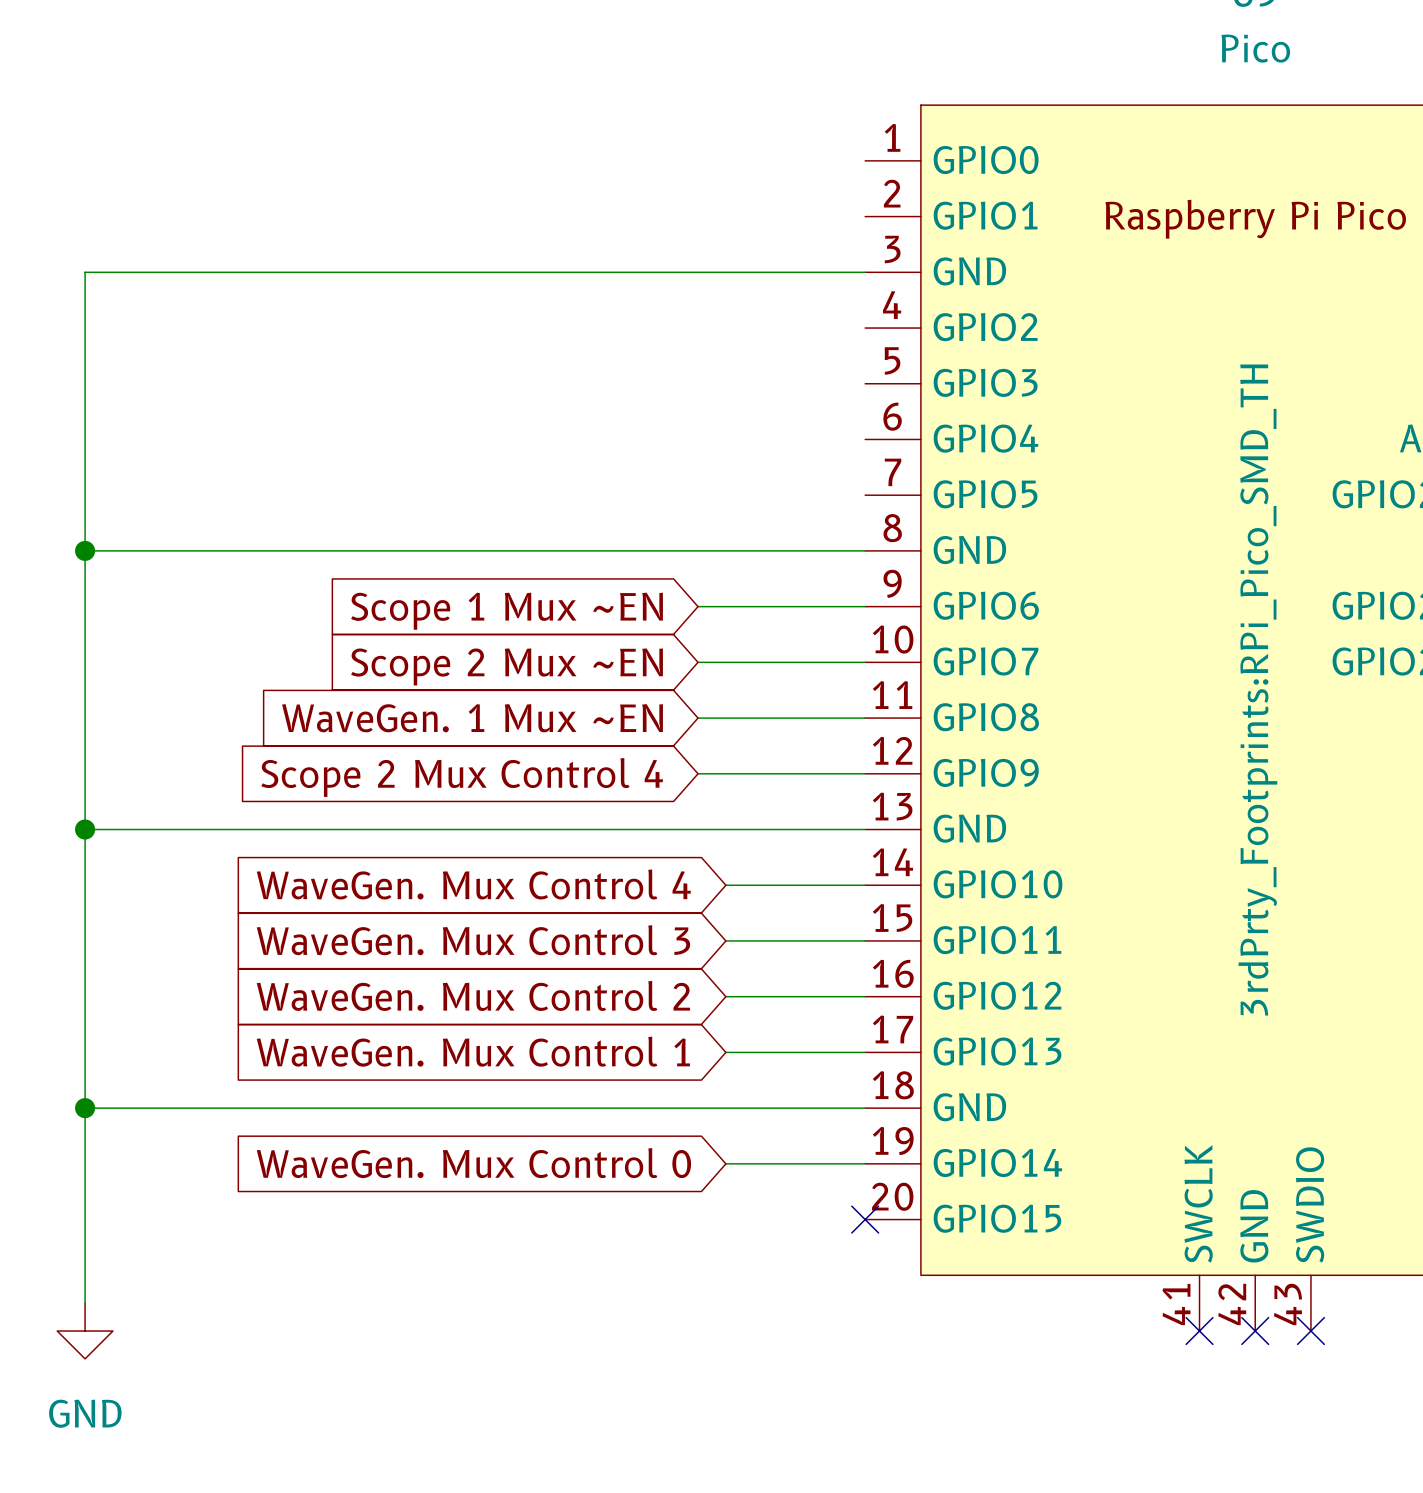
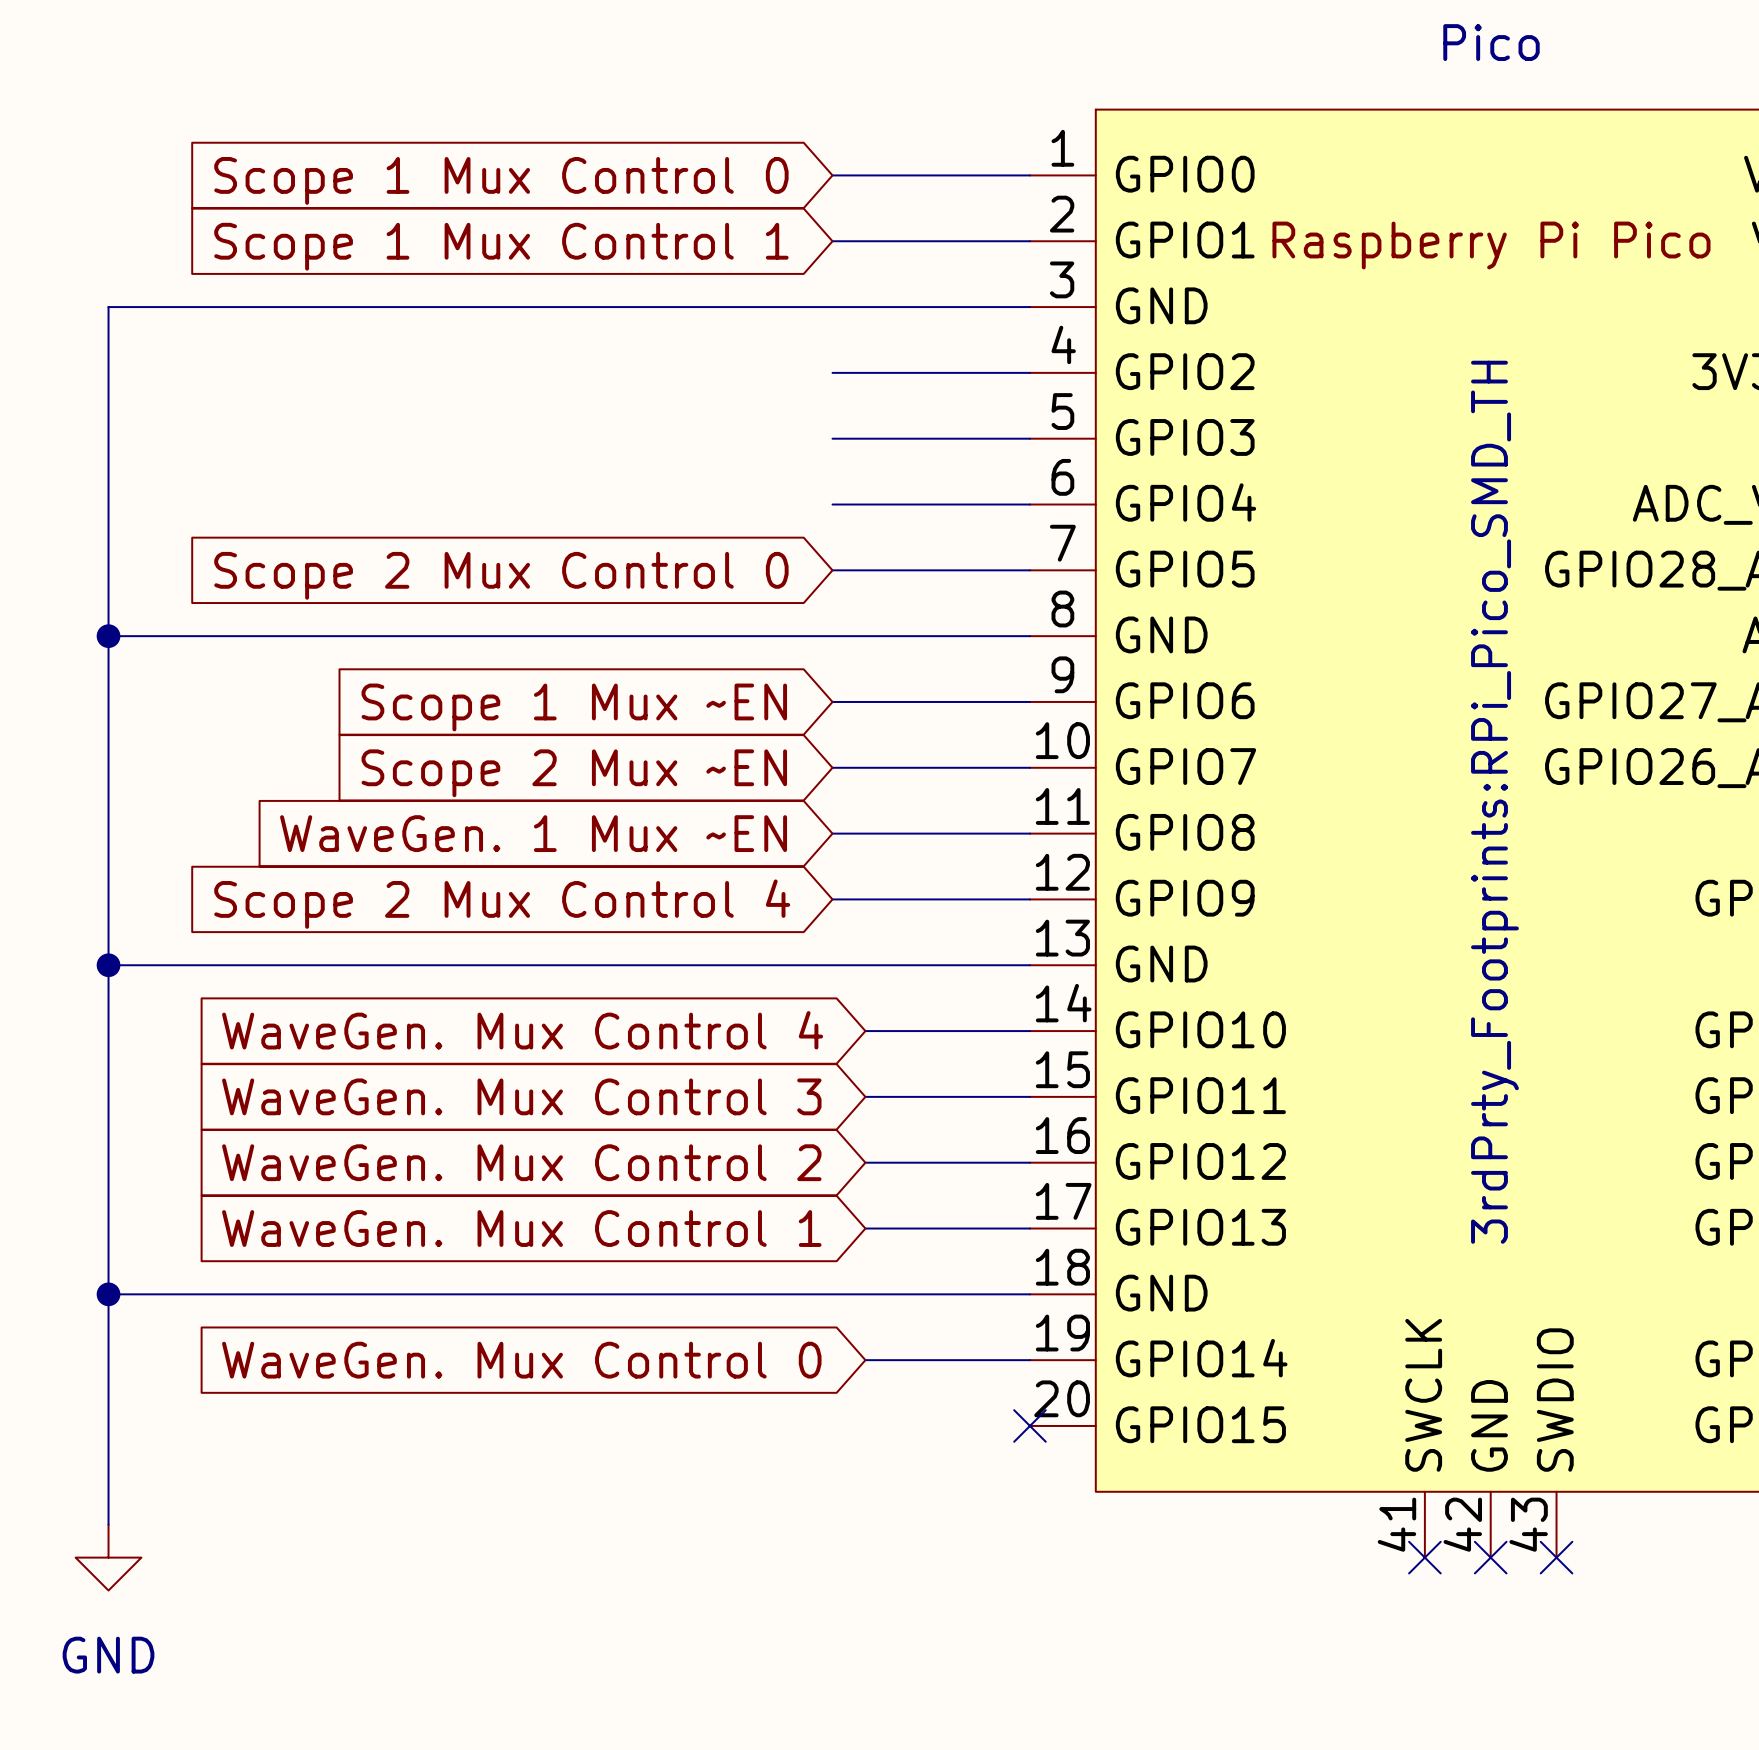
wire: none -> (832, 175) (1029, 175)
global label: none -> Scope 1 Mux Control 0 (501, 180)
wire: none -> (832, 241) (1029, 241)
global label: none -> Scope 1 Mux Control 1 (501, 246)
wire: none -> (832, 372) (1029, 372)
wire: none -> (832, 438) (1029, 438)
wire: none -> (832, 504) (1029, 504)
wire: none -> (832, 570) (1029, 570)
global label: none -> Scope 2 Mux Control 0 (501, 575)

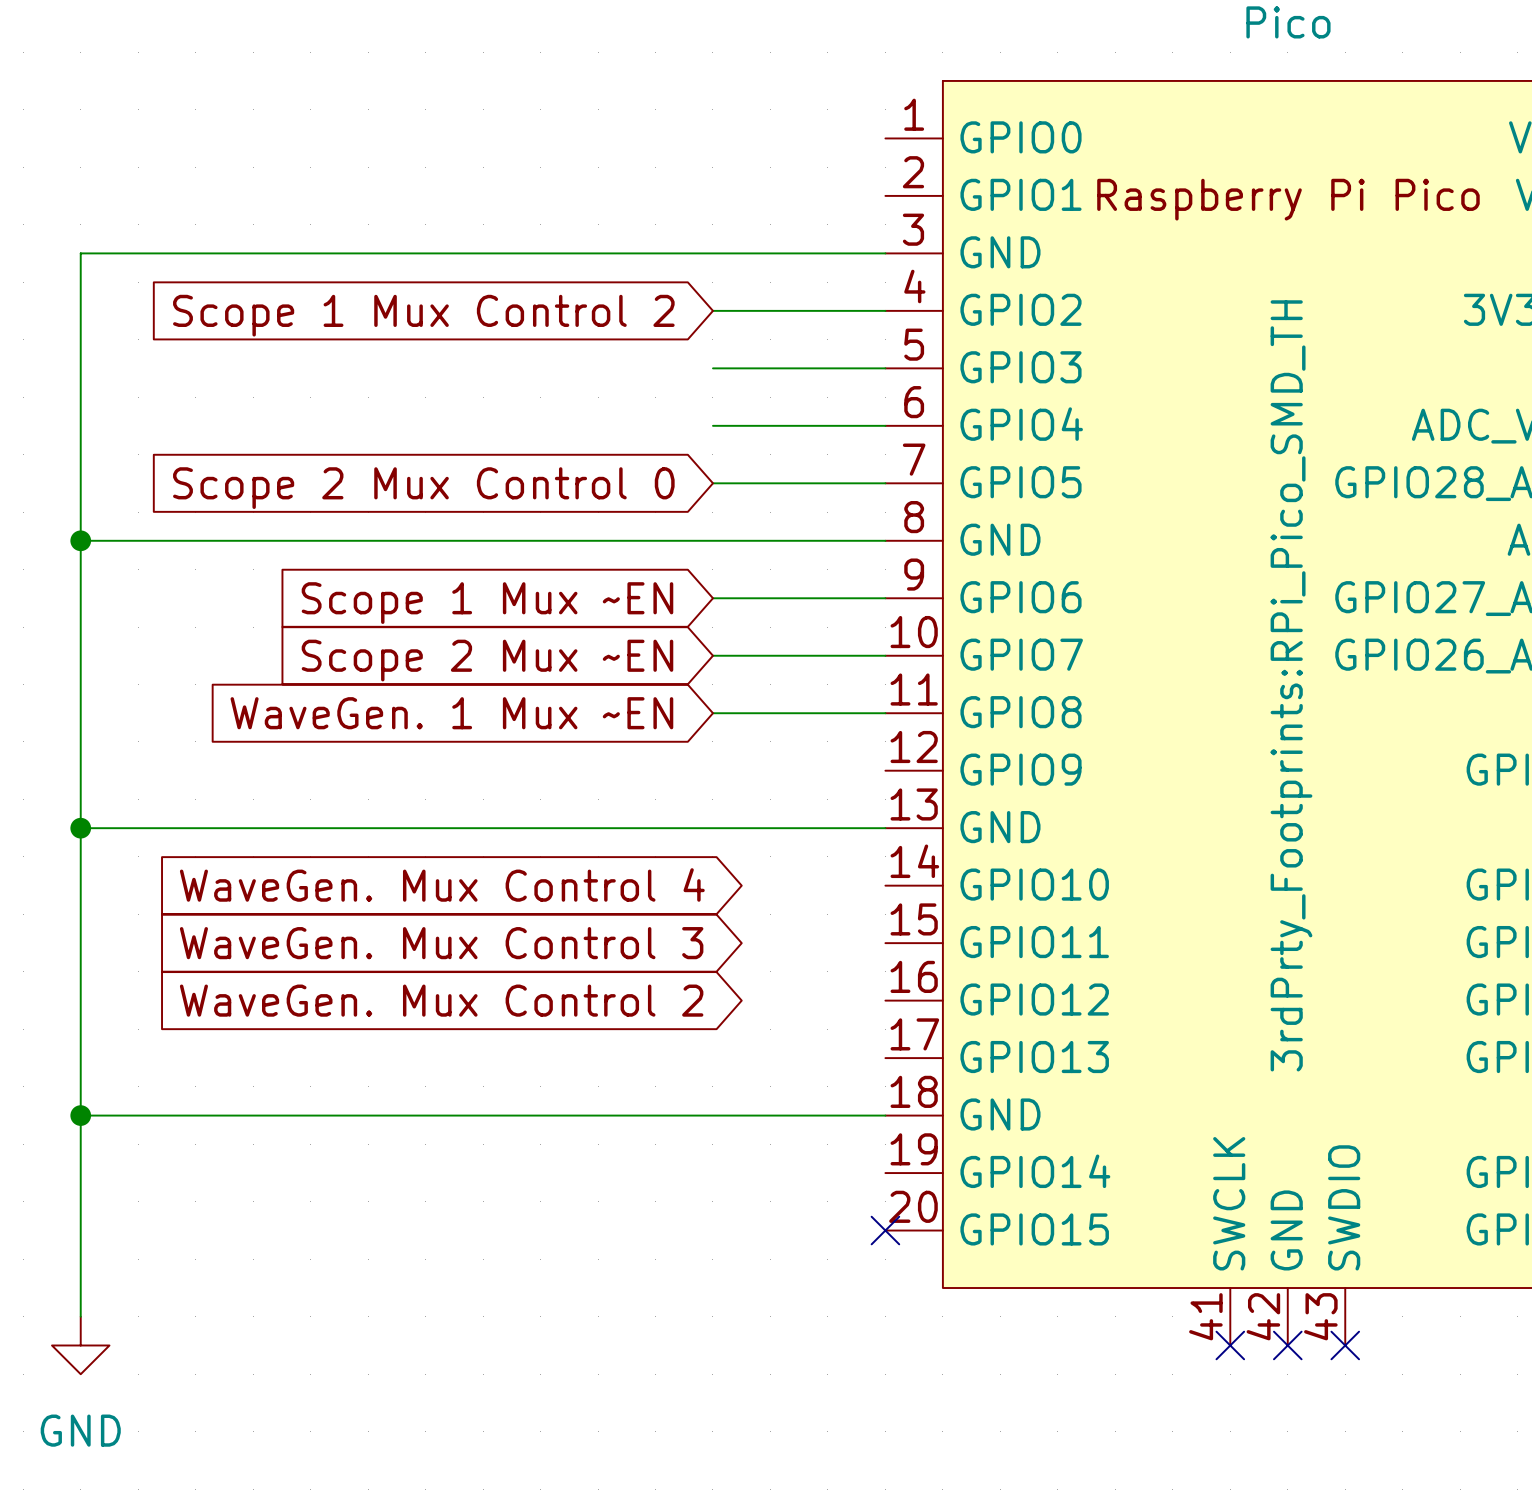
wire: (832, 175) (1029, 175) -> none
global label: Scope 1 Mux Control 0 (501, 180) -> none
wire: (832, 241) (1029, 241) -> none
global label: Scope 1 Mux Control 1 (501, 246) -> none
global label: none -> Scope 1 Mux Control 2 (423, 315)
wire: (832, 899) (1029, 899) -> none
global label: Scope 2 Mux Control 4 (502, 904) -> none
wire: (865, 1031) (1029, 1031) -> none
wire: (865, 1096) (1029, 1096) -> none
wire: (865, 1162) (1029, 1162) -> none
global label: WaveGen. Mux Control 1 (521, 1228) -> none
wire: (865, 1228) (1029, 1228) -> none
global label: WaveGen. Mux Control 0 (521, 1360) -> none
wire: (865, 1360) (1029, 1360) -> none

